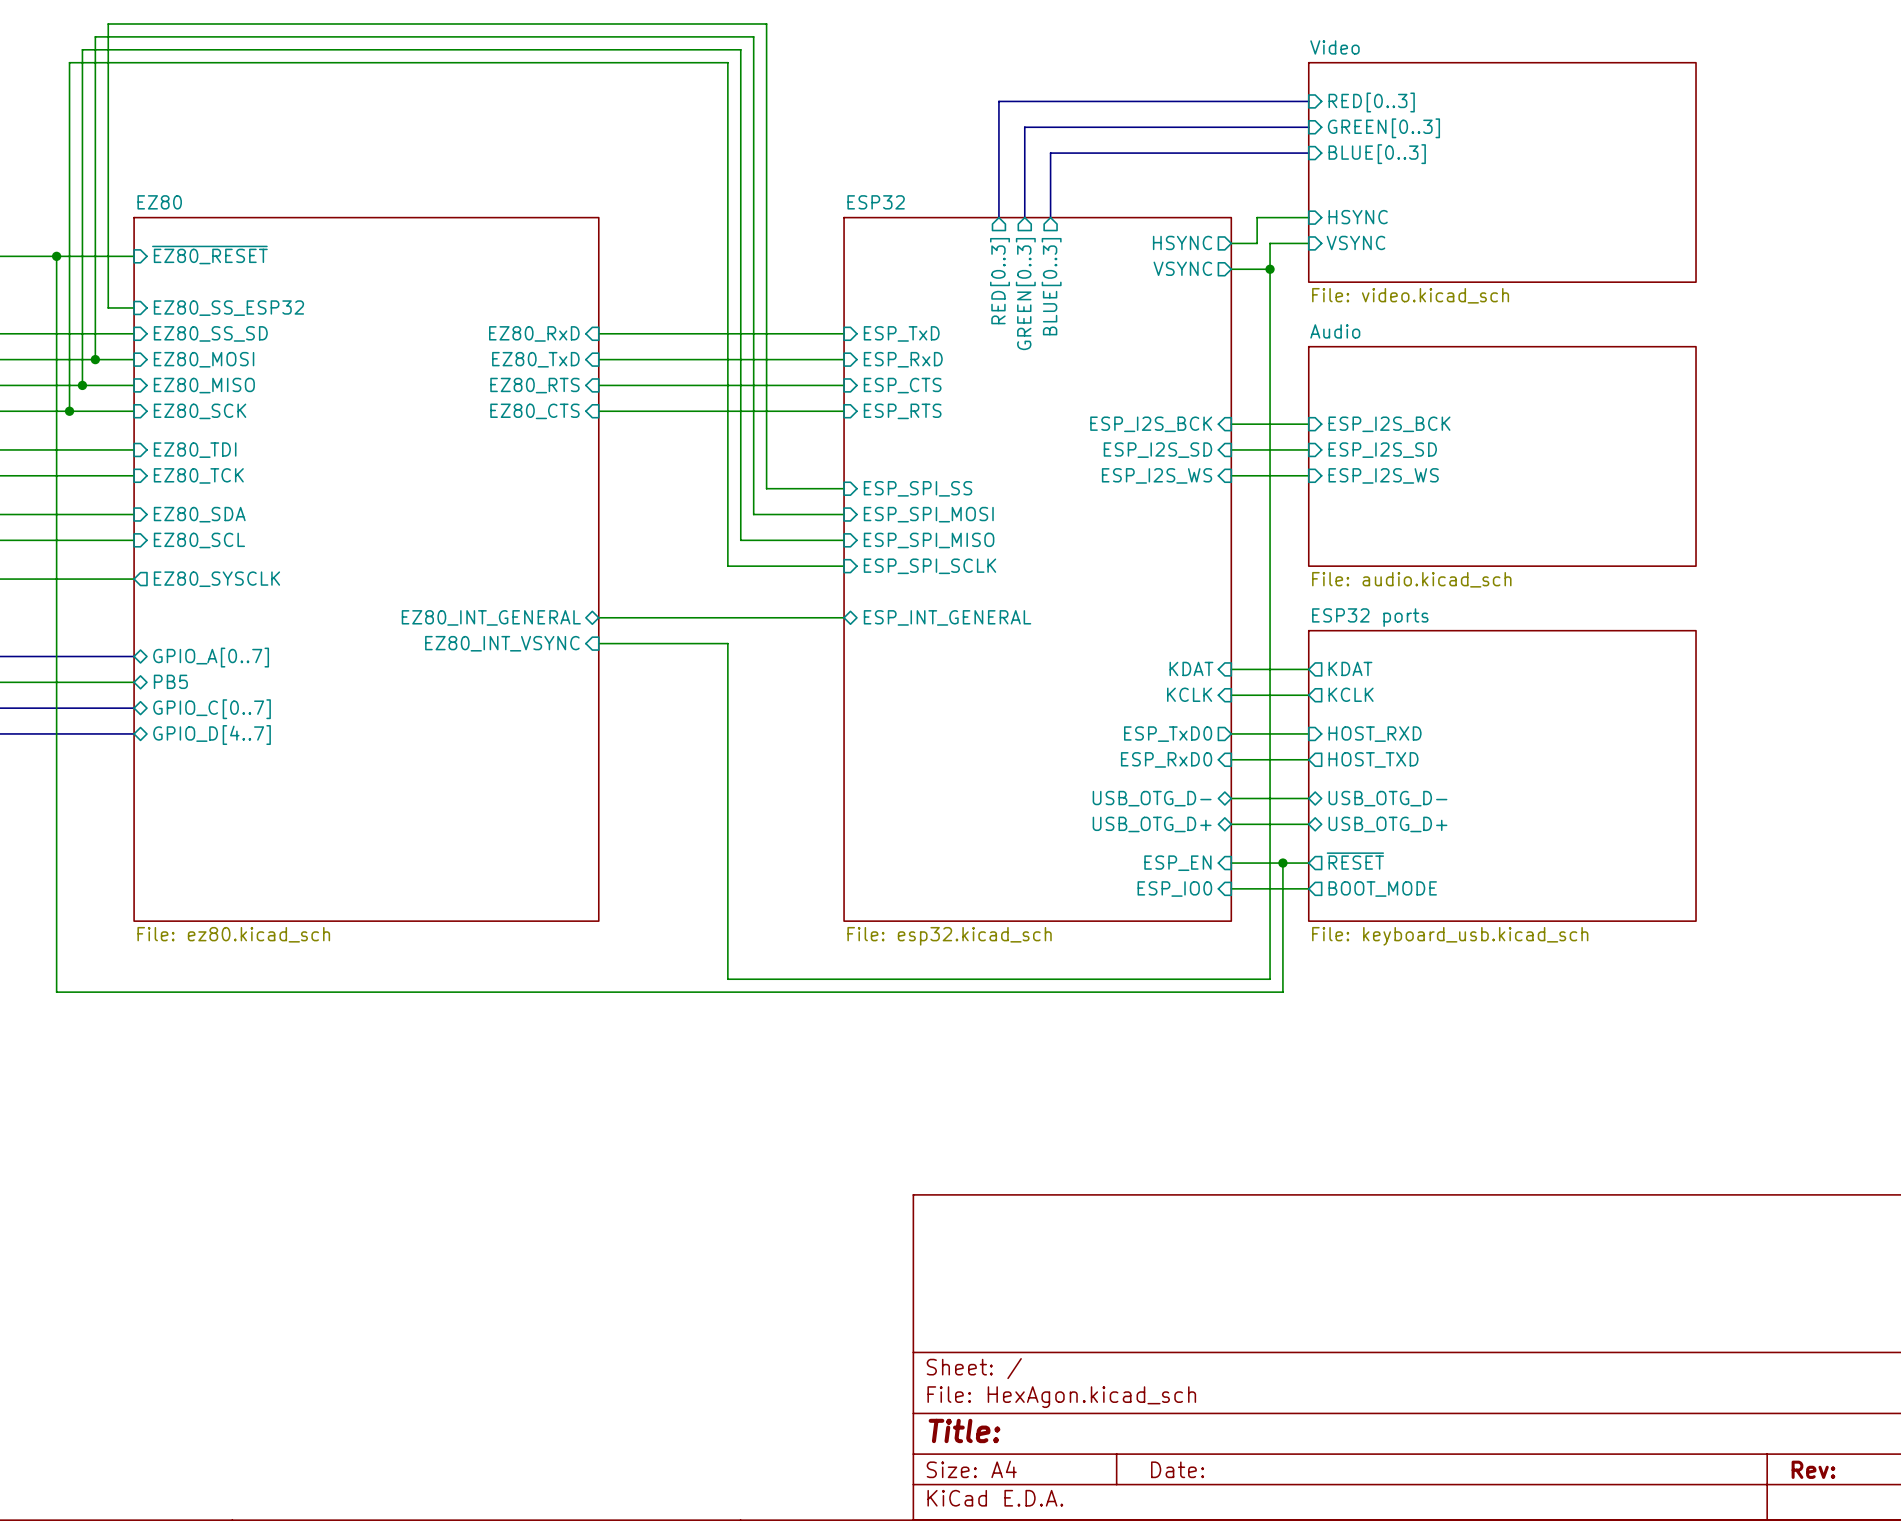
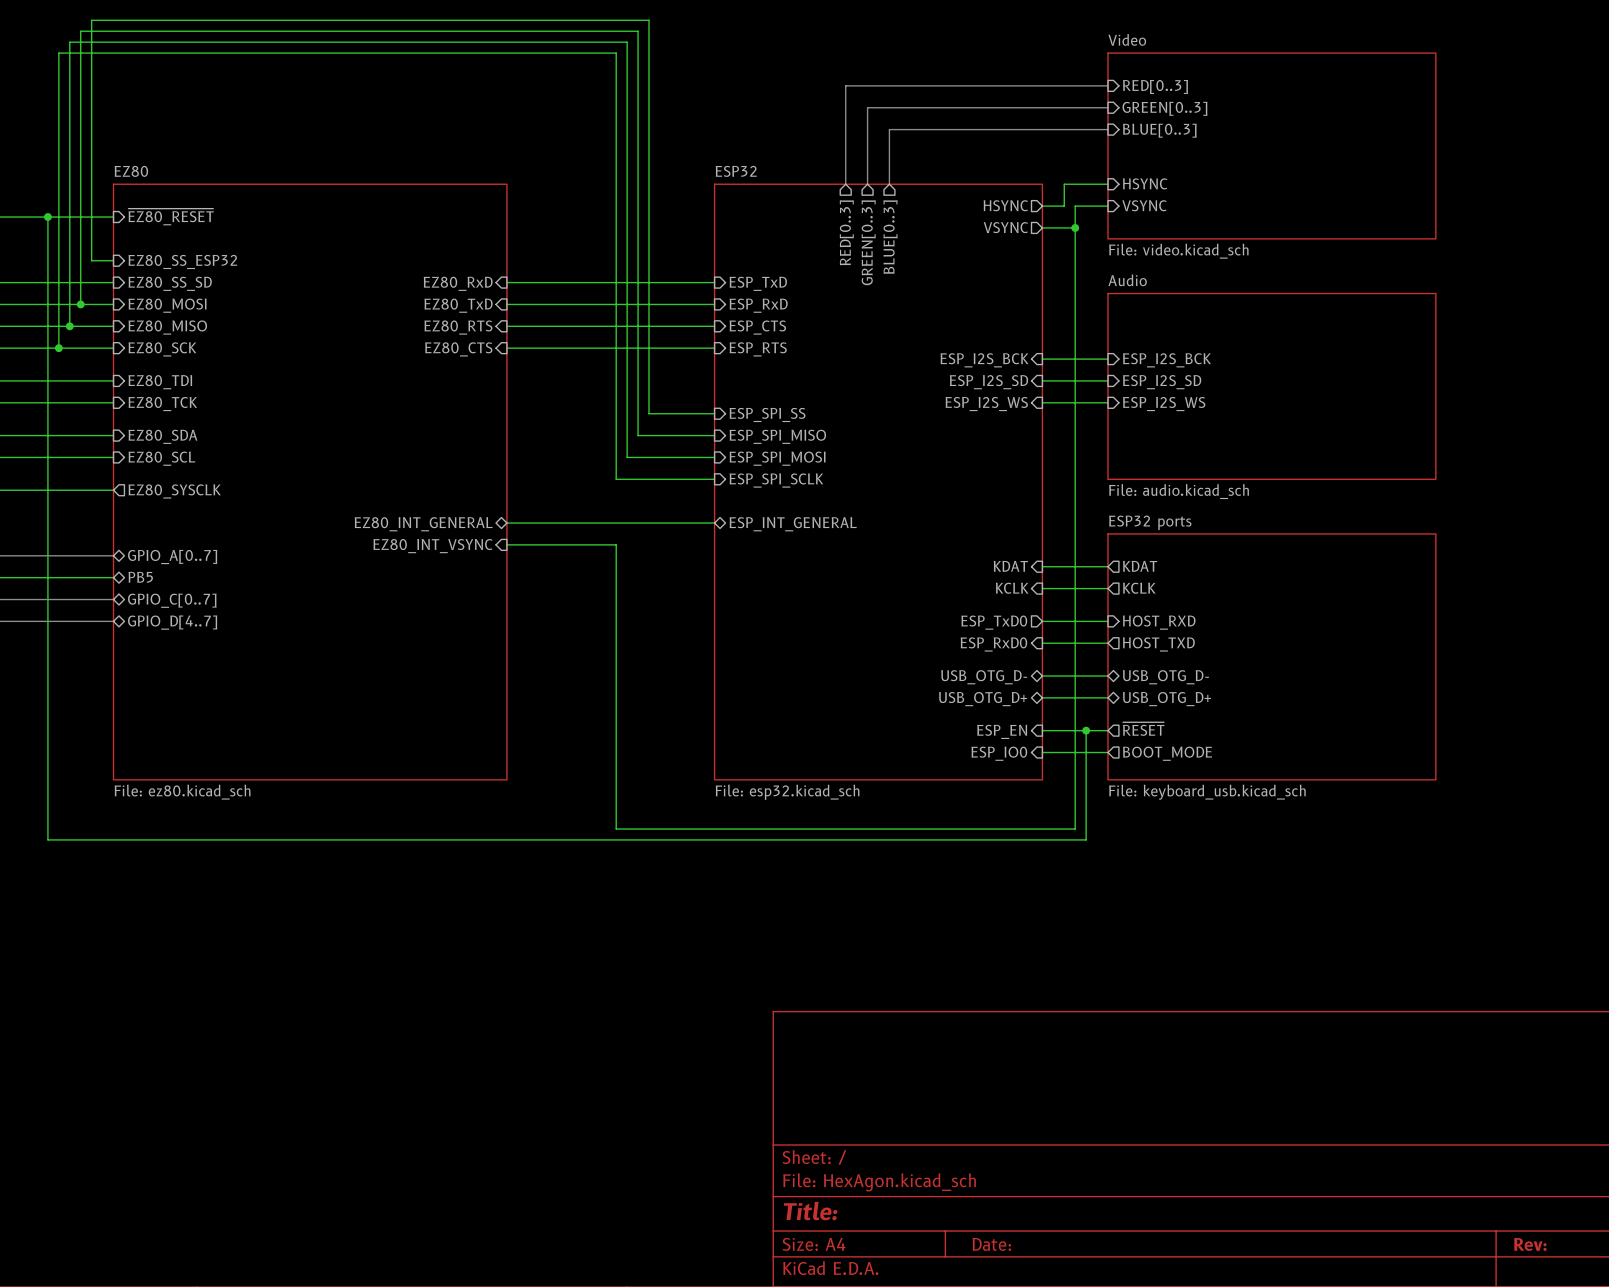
sheet pin: ESP_SPI_MOSI (928, 514) -> ESP_SPI_MISO (777, 436)
sheet pin: ESP_SPI_MISO (929, 540) -> ESP_SPI_MOSI (777, 458)

